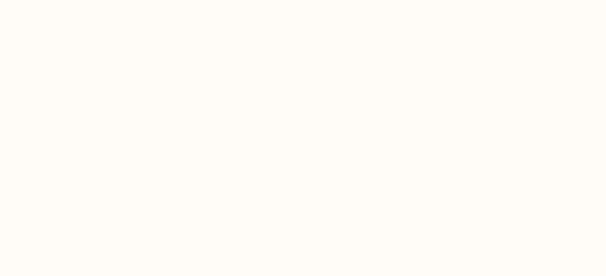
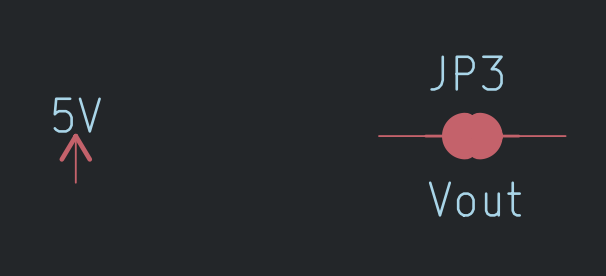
JP3: none -> Vout (472, 136)
power symbol: none -> 5V (75, 158)

